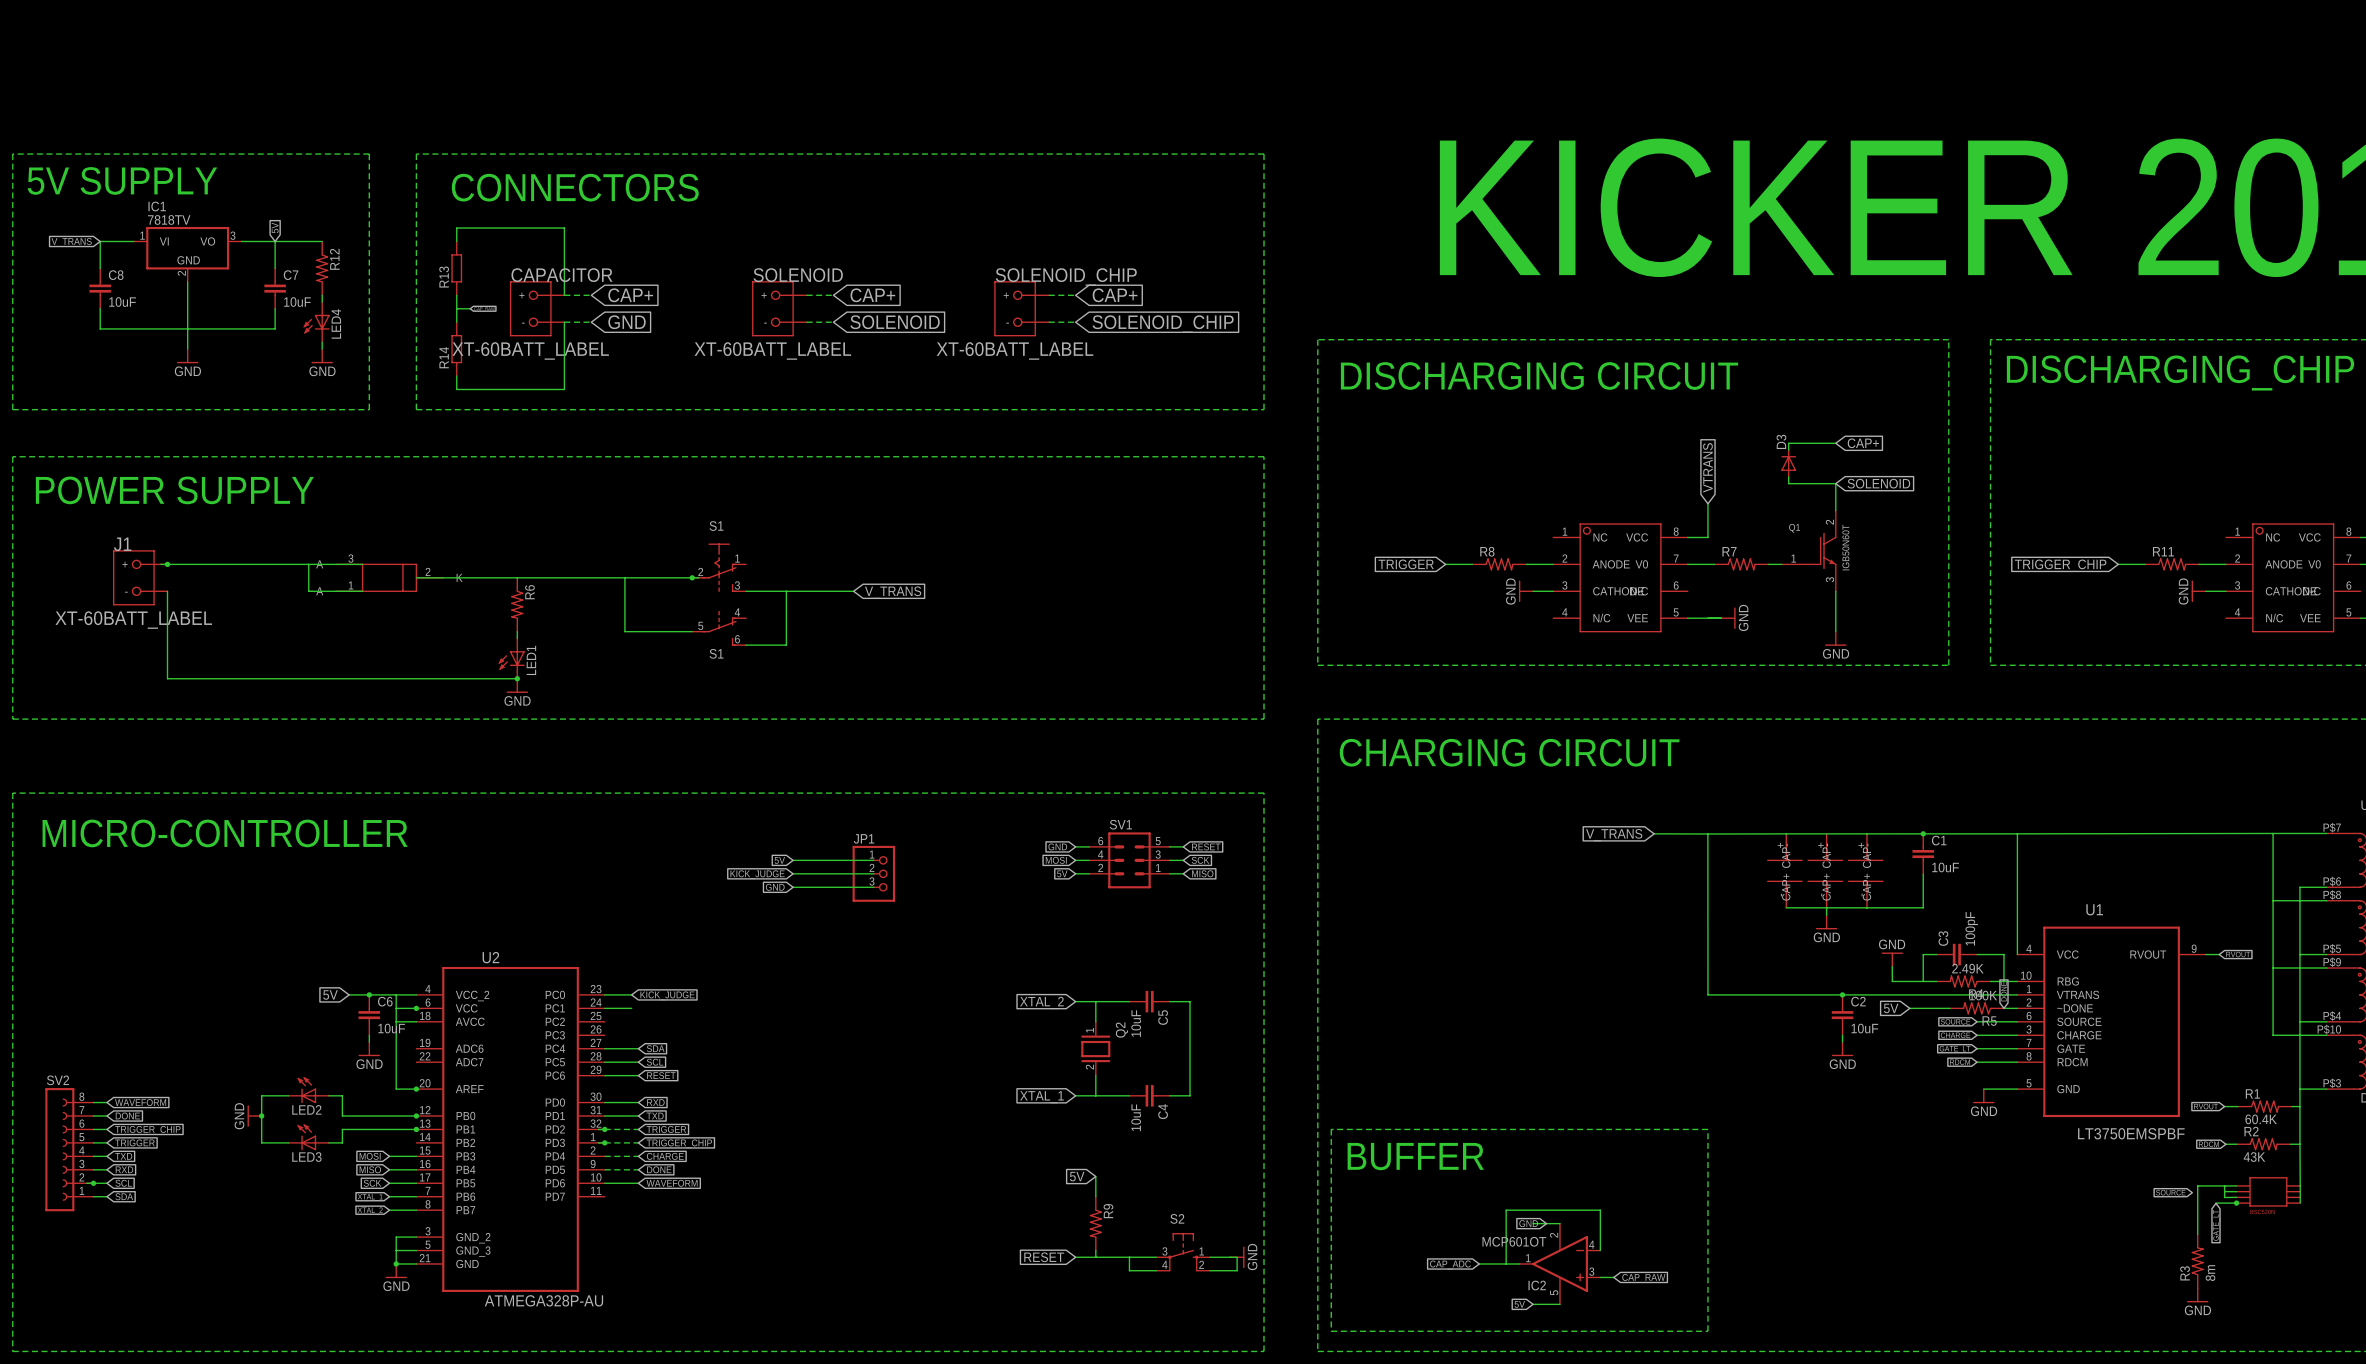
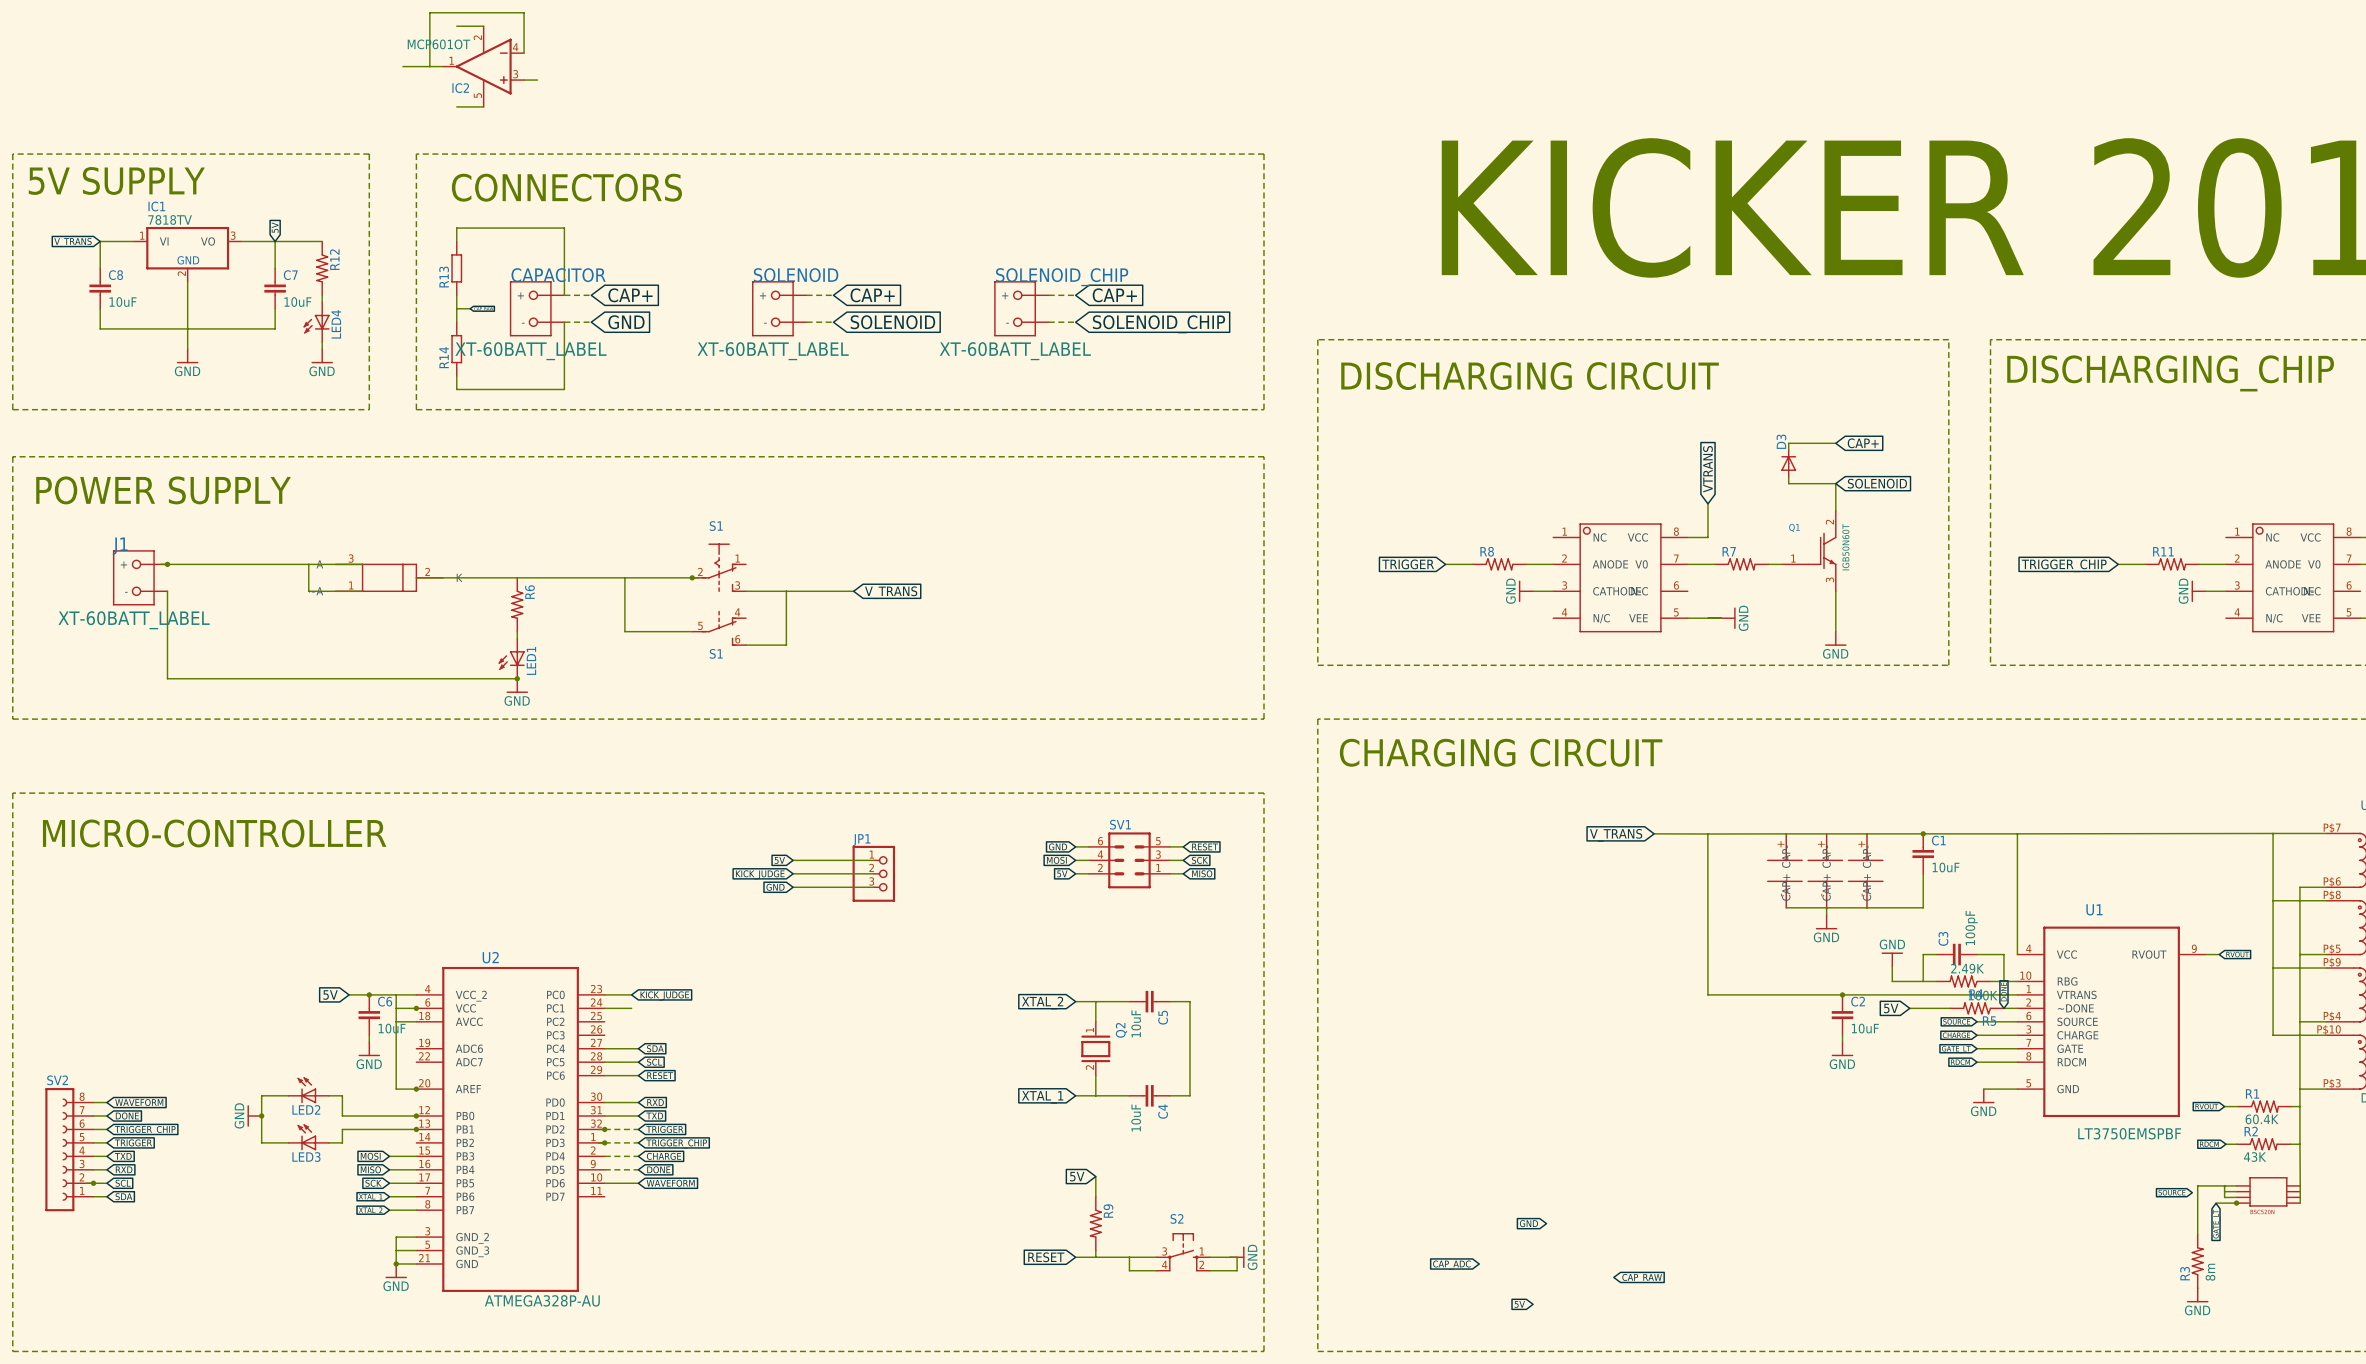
wire: none -> (456, 26) (483, 26)
wire: none -> (524, 53) (524, 12) (429, 12) (429, 66)
wire: none -> (402, 66) (443, 66)
wire: none -> (524, 80) (537, 80)
wire: none -> (456, 106) (483, 106)
wire: (1331, 1129) (1707, 1129) (1707, 1331) (1331, 1331) (1331, 1129) -> none
text: BUFFER (1415, 1156) -> none
wire: (1533, 1223) (1559, 1223) -> none
wire: (1600, 1250) (1600, 1210) (1506, 1210) (1506, 1263) -> none
wire: (1479, 1263) (1519, 1263) -> none
IC2 position: (1559, 1263) -> (483, 66)
wire: (1600, 1277) (1613, 1277) -> none
wire: (1533, 1304) (1559, 1304) -> none

